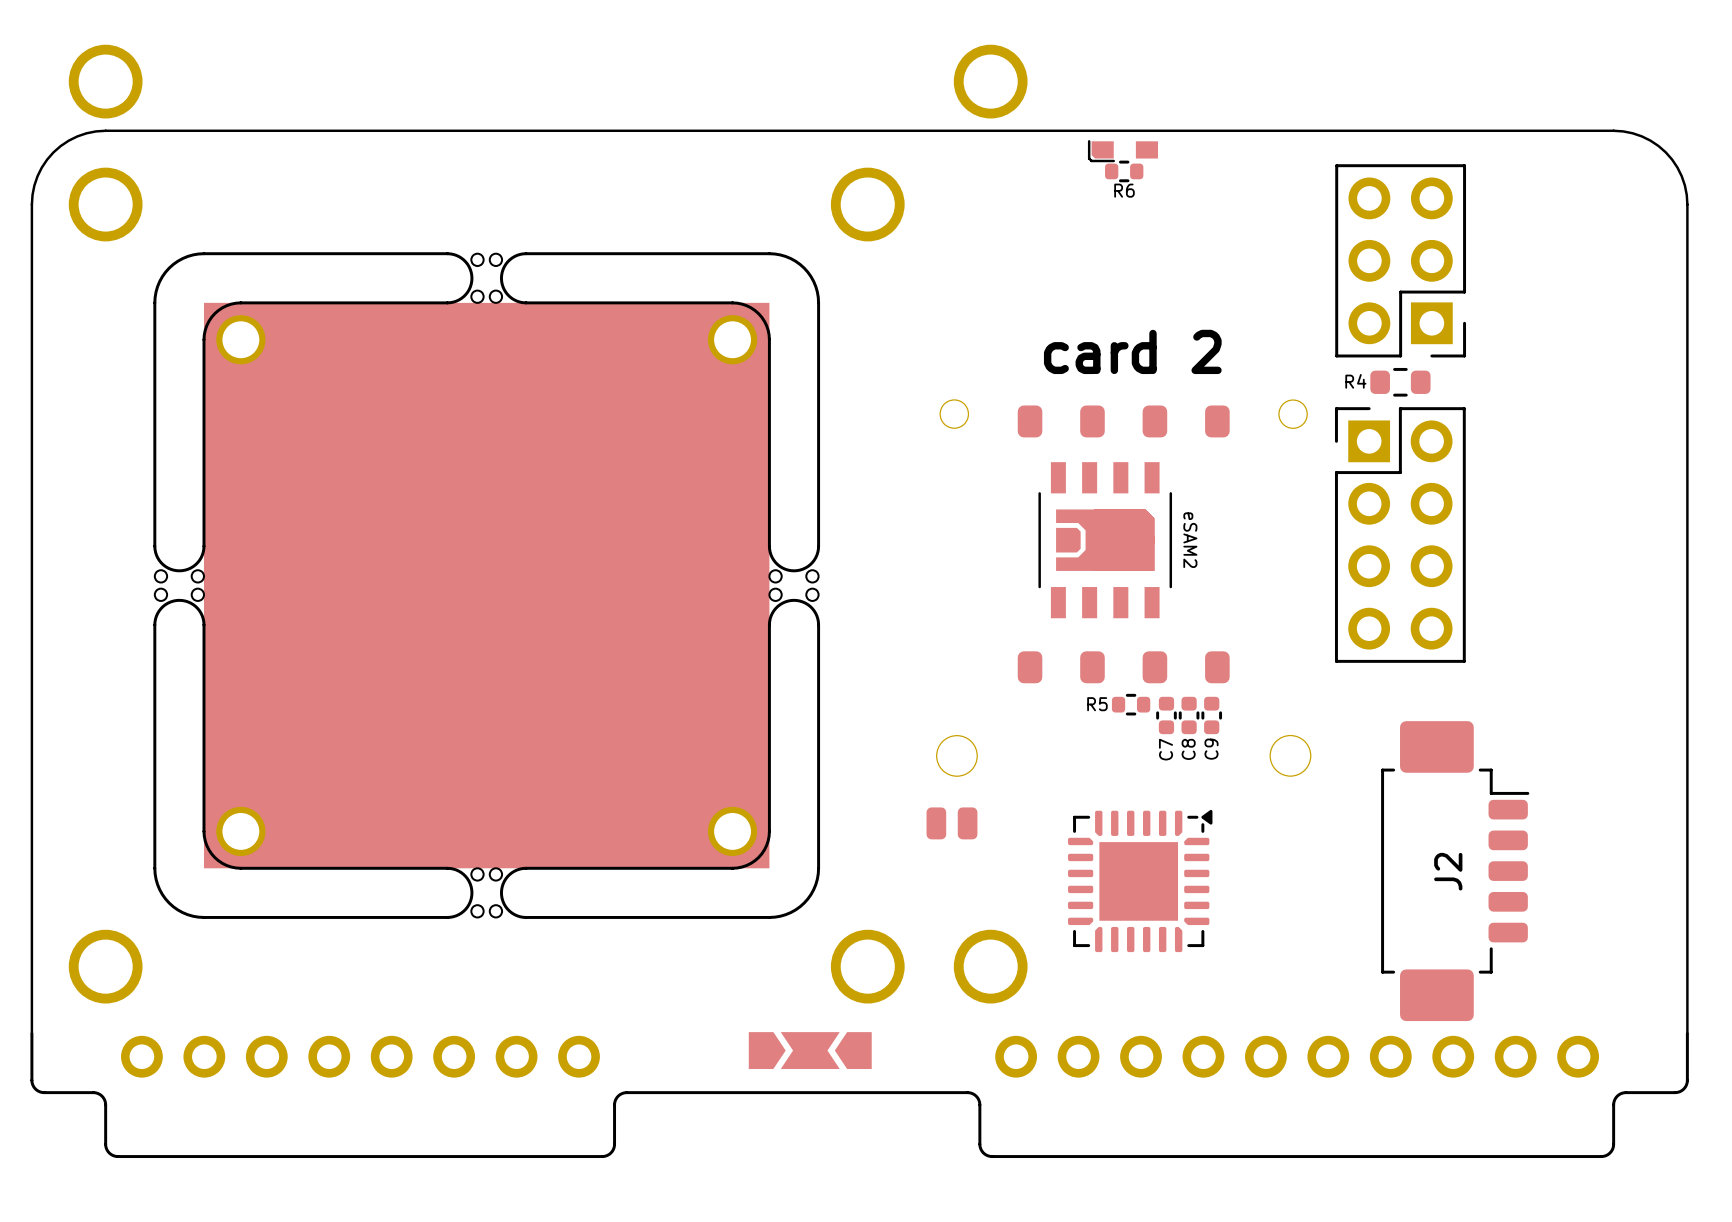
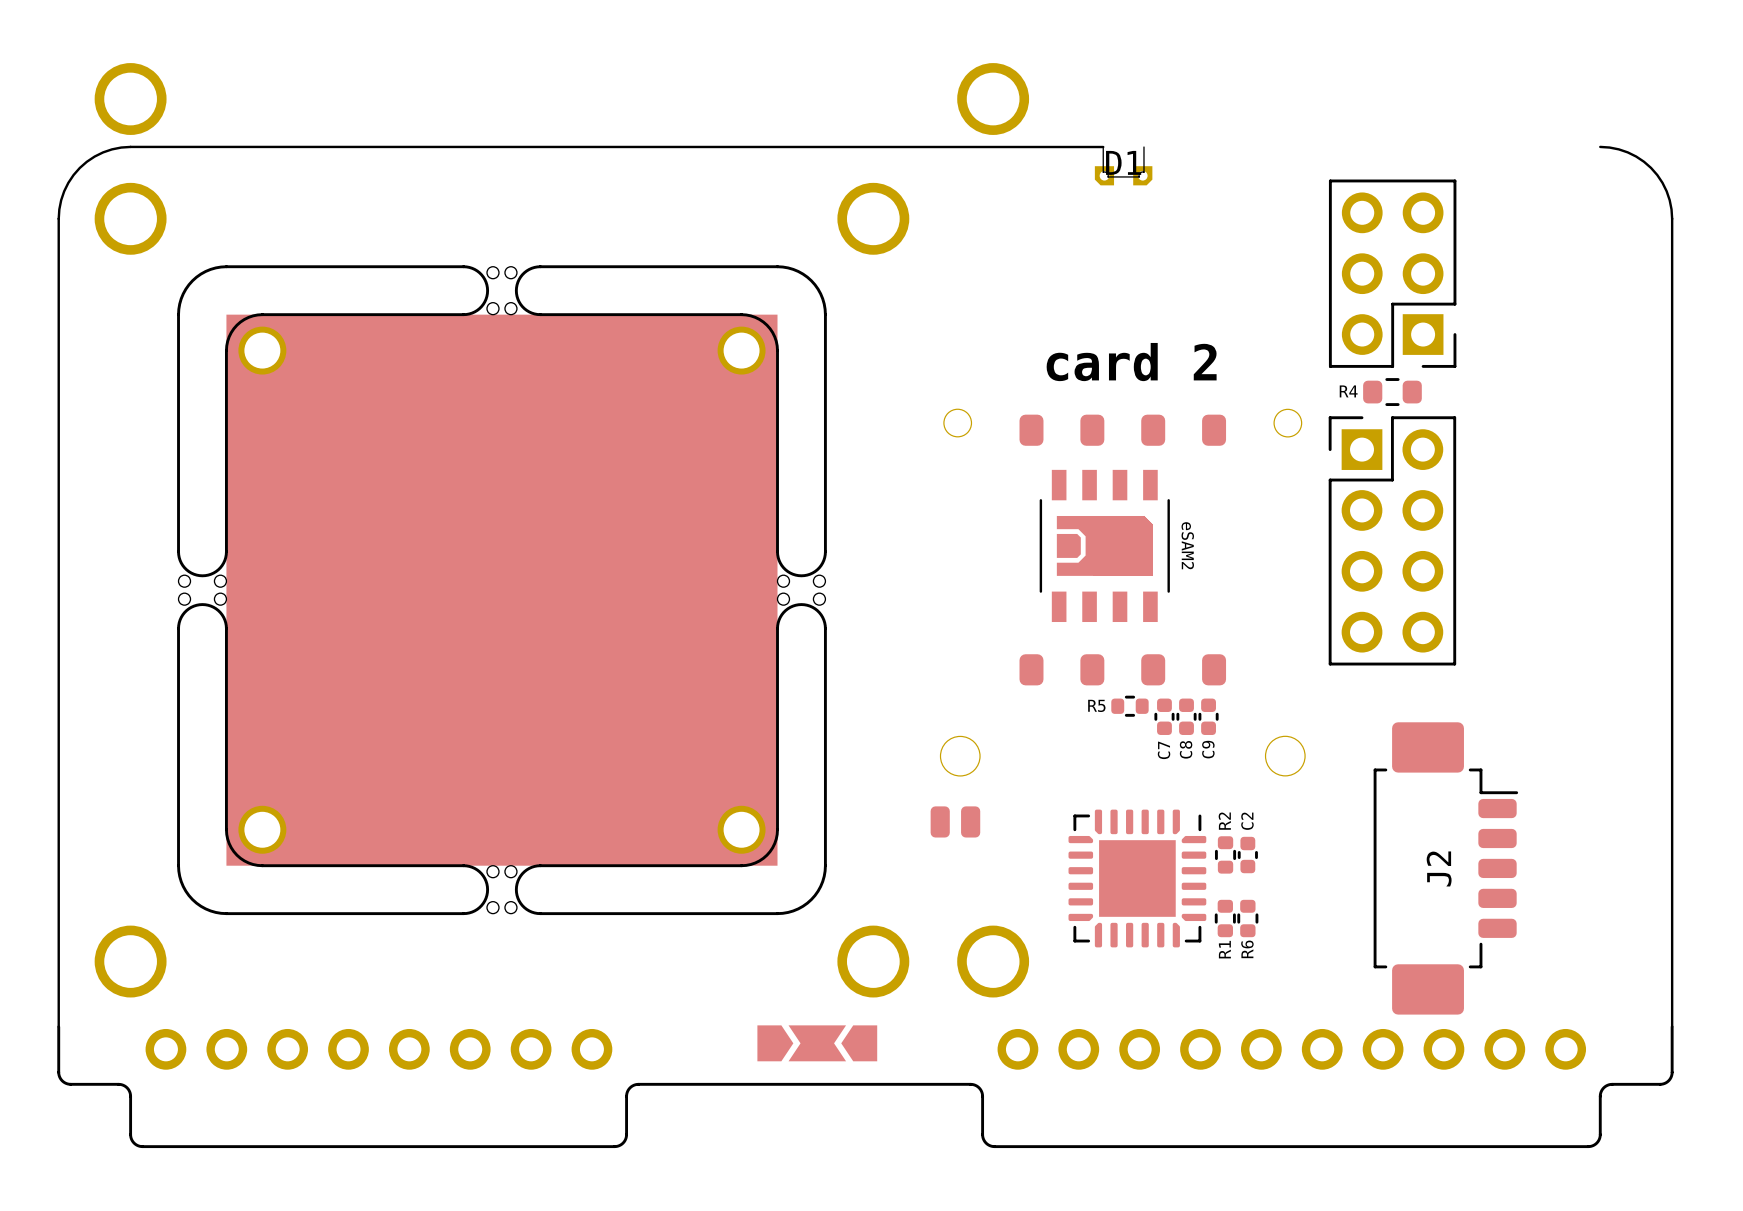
board edge: (105, 130) (1613, 130) -> (130, 146) (1103, 147)
D1: none -> (1123, 165)
part: (1122, 151) -> none
R6 rotation: 0° (1124, 171) -> 90° clockwise (1247, 918)
R6 position: (1124, 171) -> (1247, 918)
part footprint: [1068, 809, 1213, 953] -> [1068, 809, 1207, 948]
R2: none -> (1225, 854)
C2: none -> (1247, 855)
R1: none -> (1225, 918)

